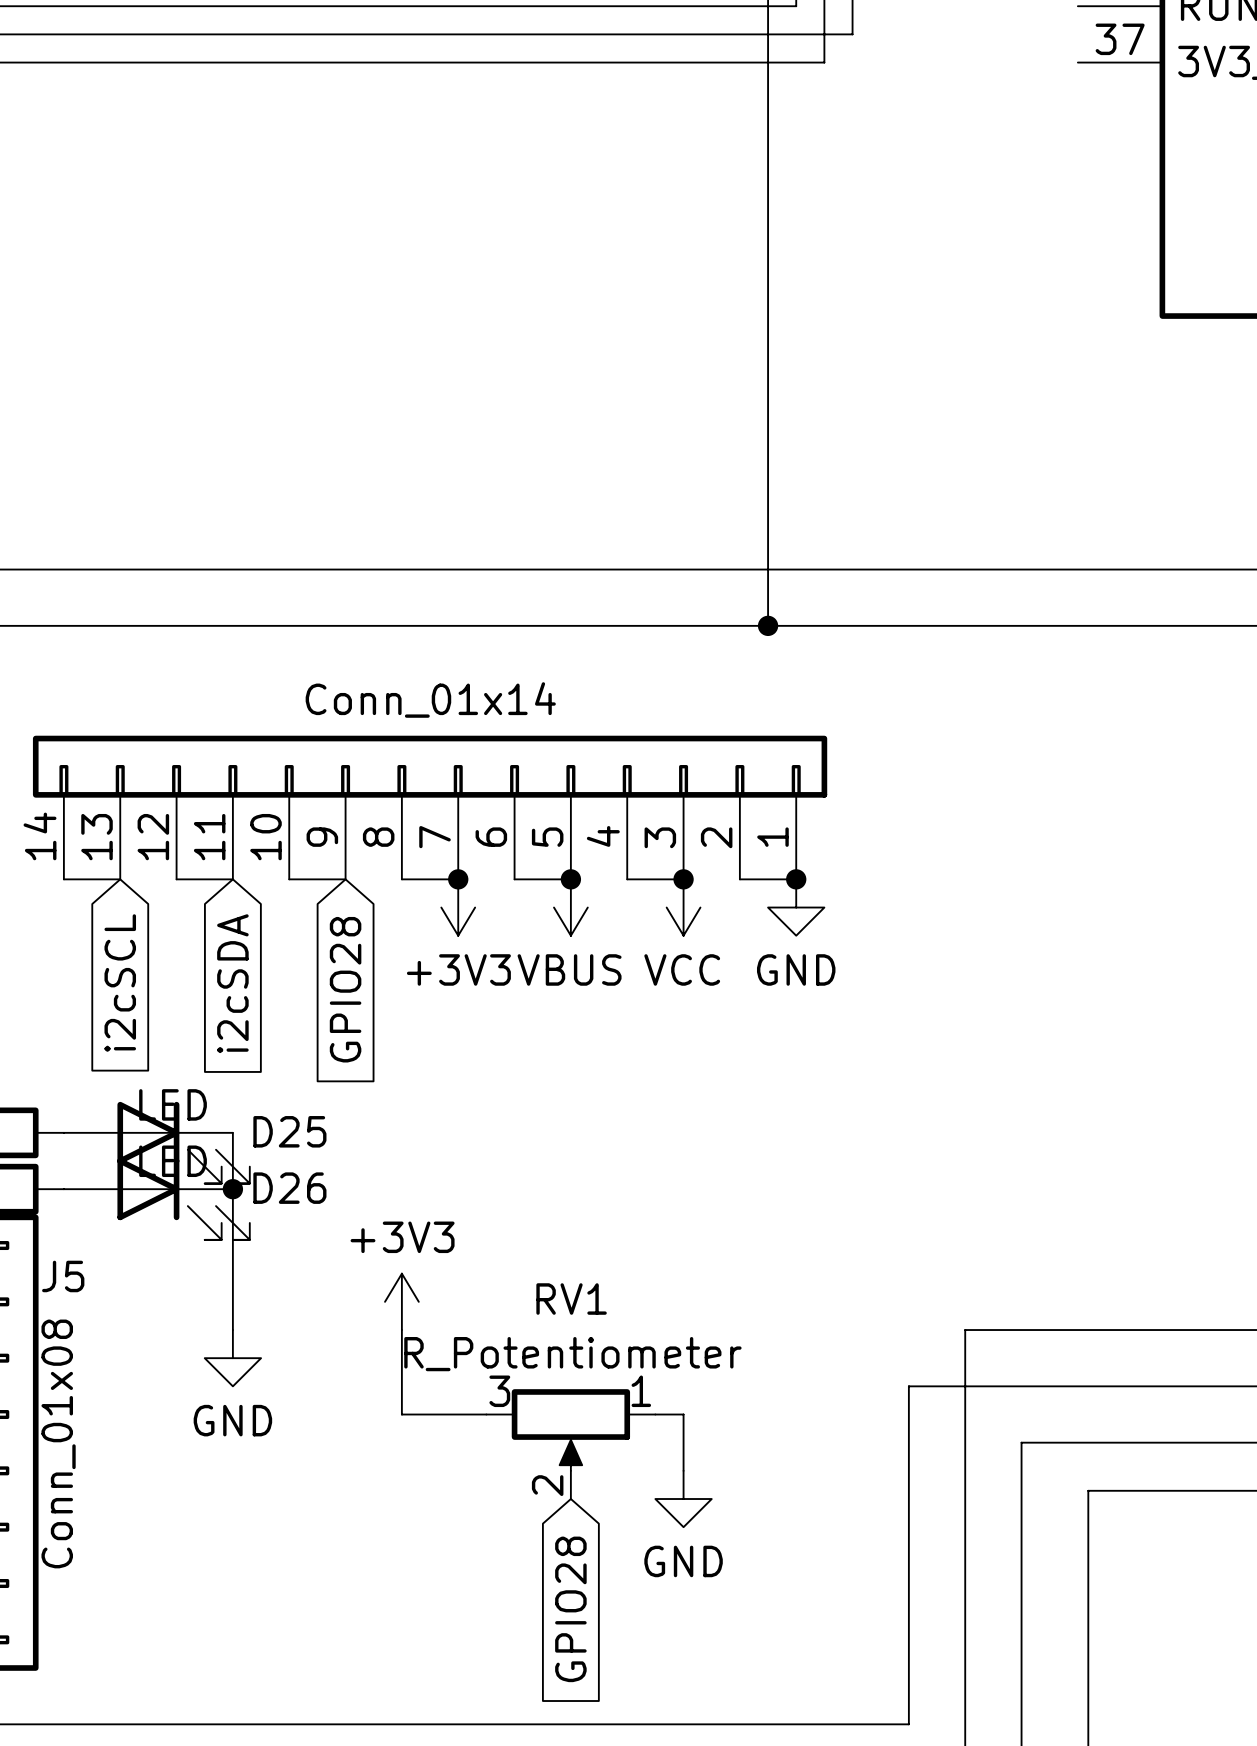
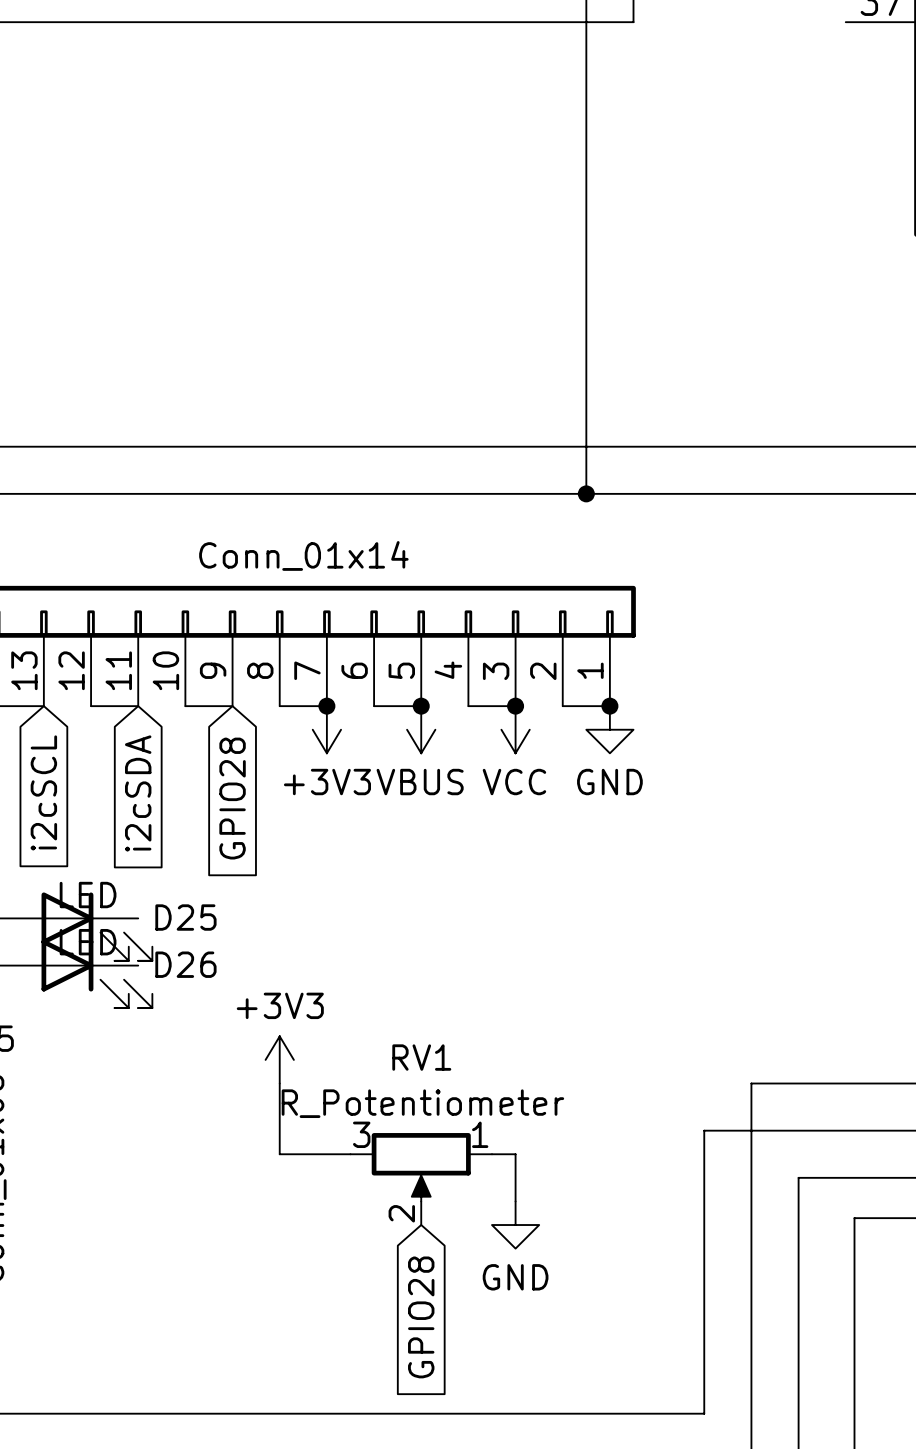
wire: (232, 1132) (232, 1330) -> none
junction: (232, 1189) -> none
power symbol: GND (232, 1358) -> none

